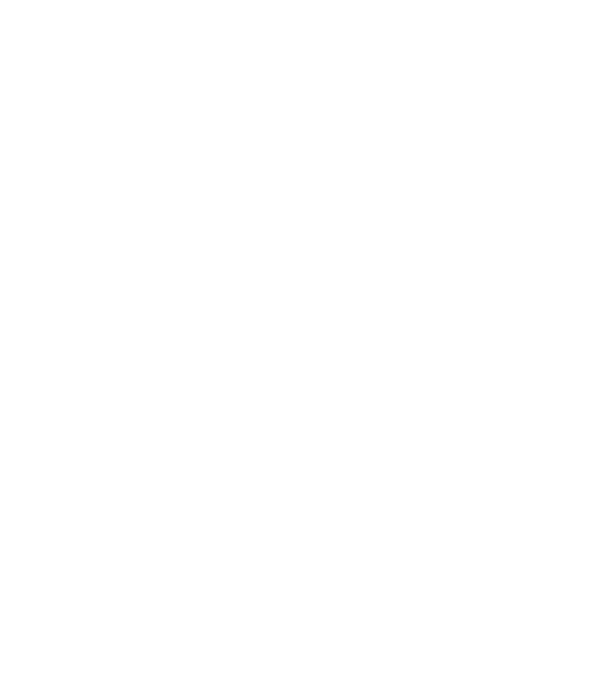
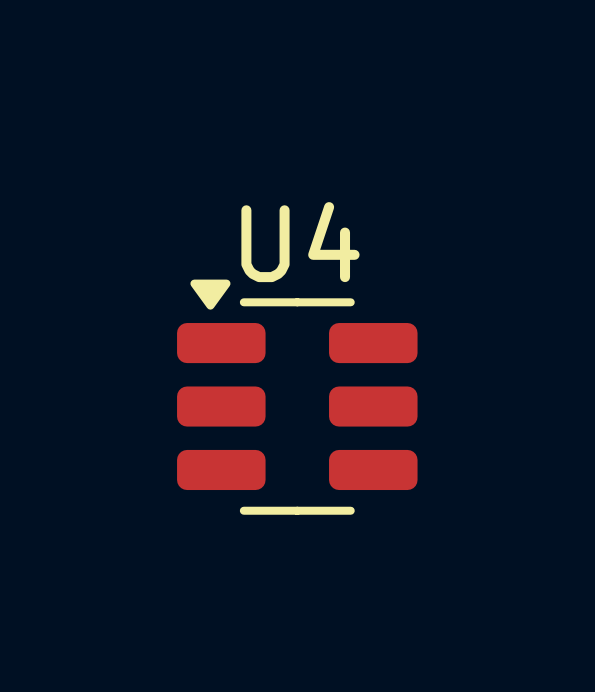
U4: none -> (297, 397)

